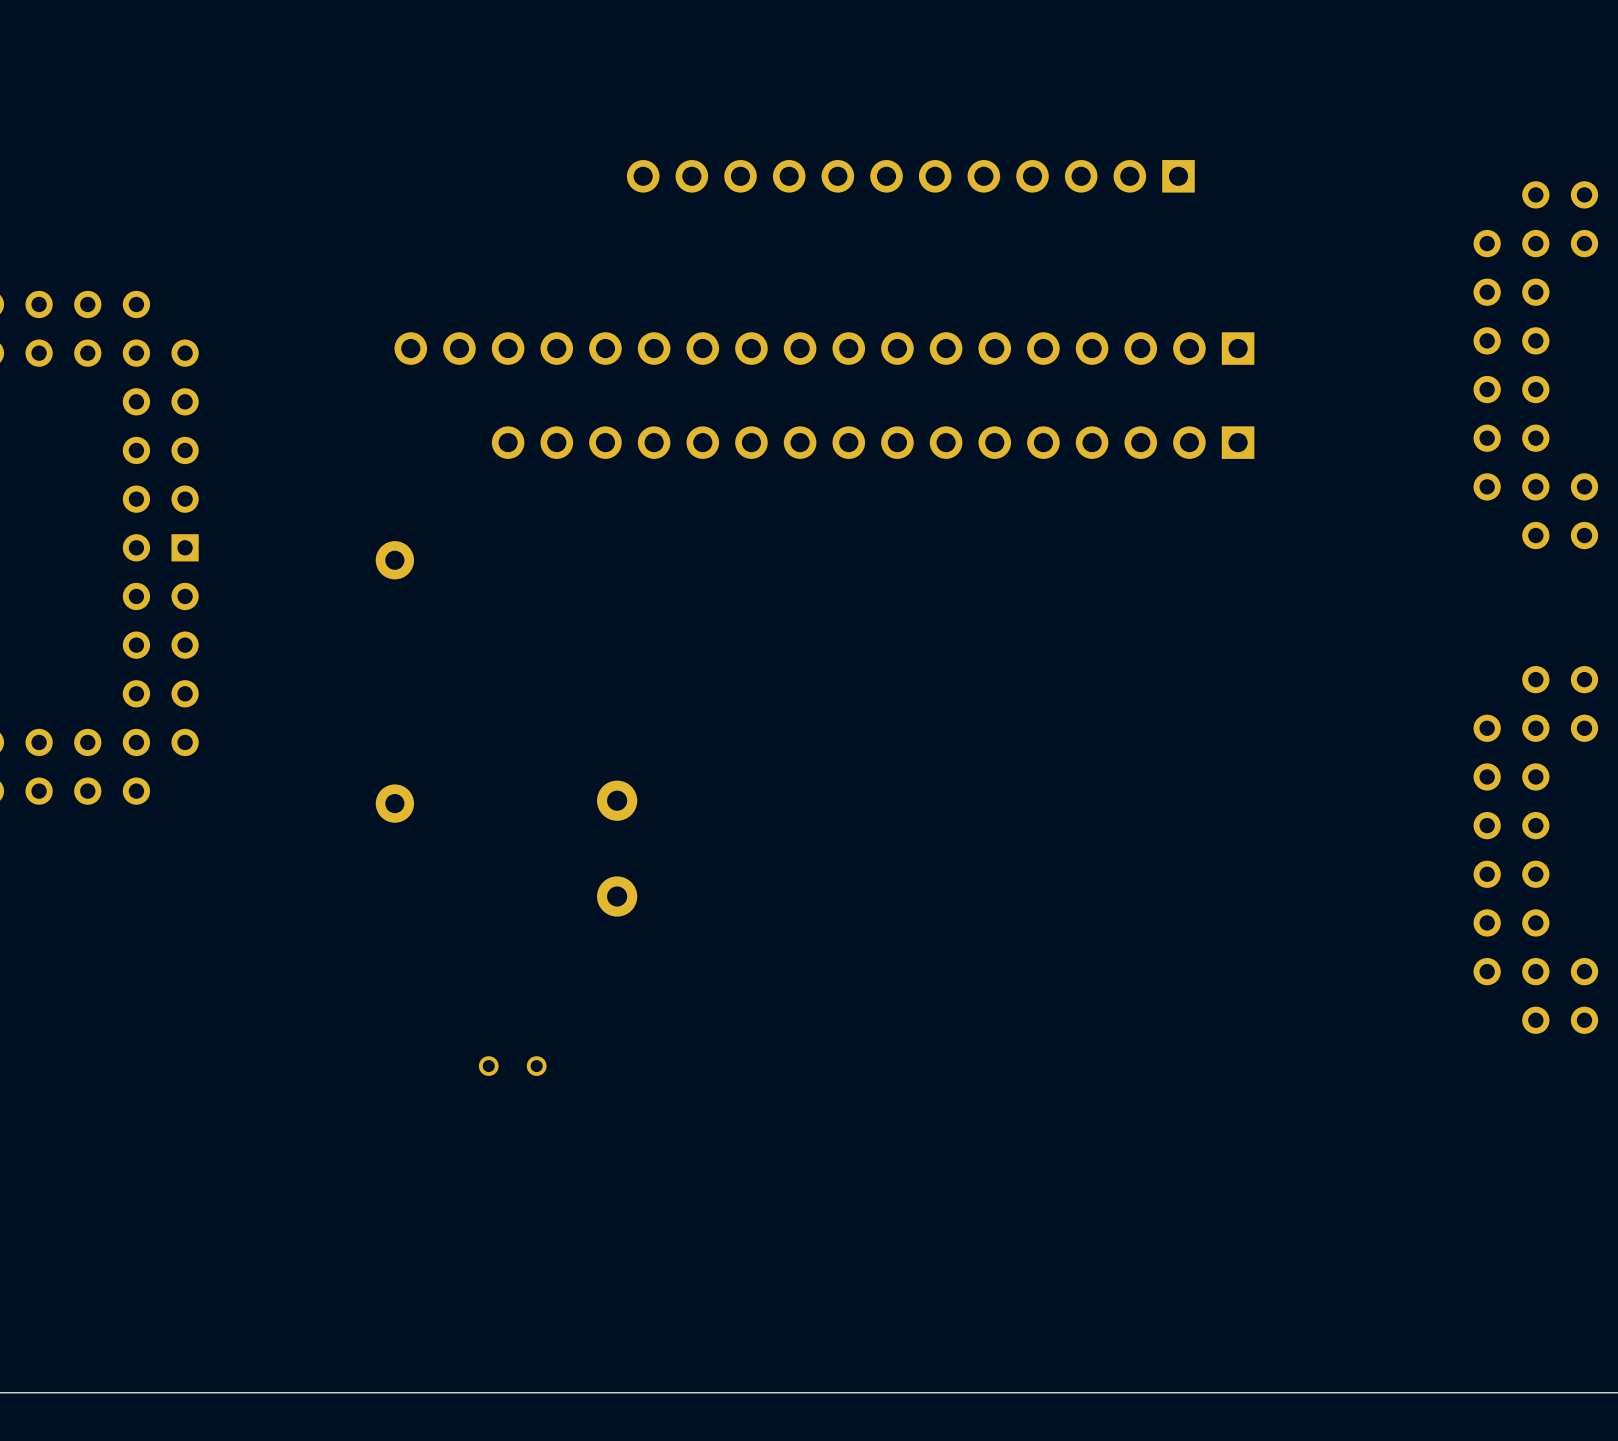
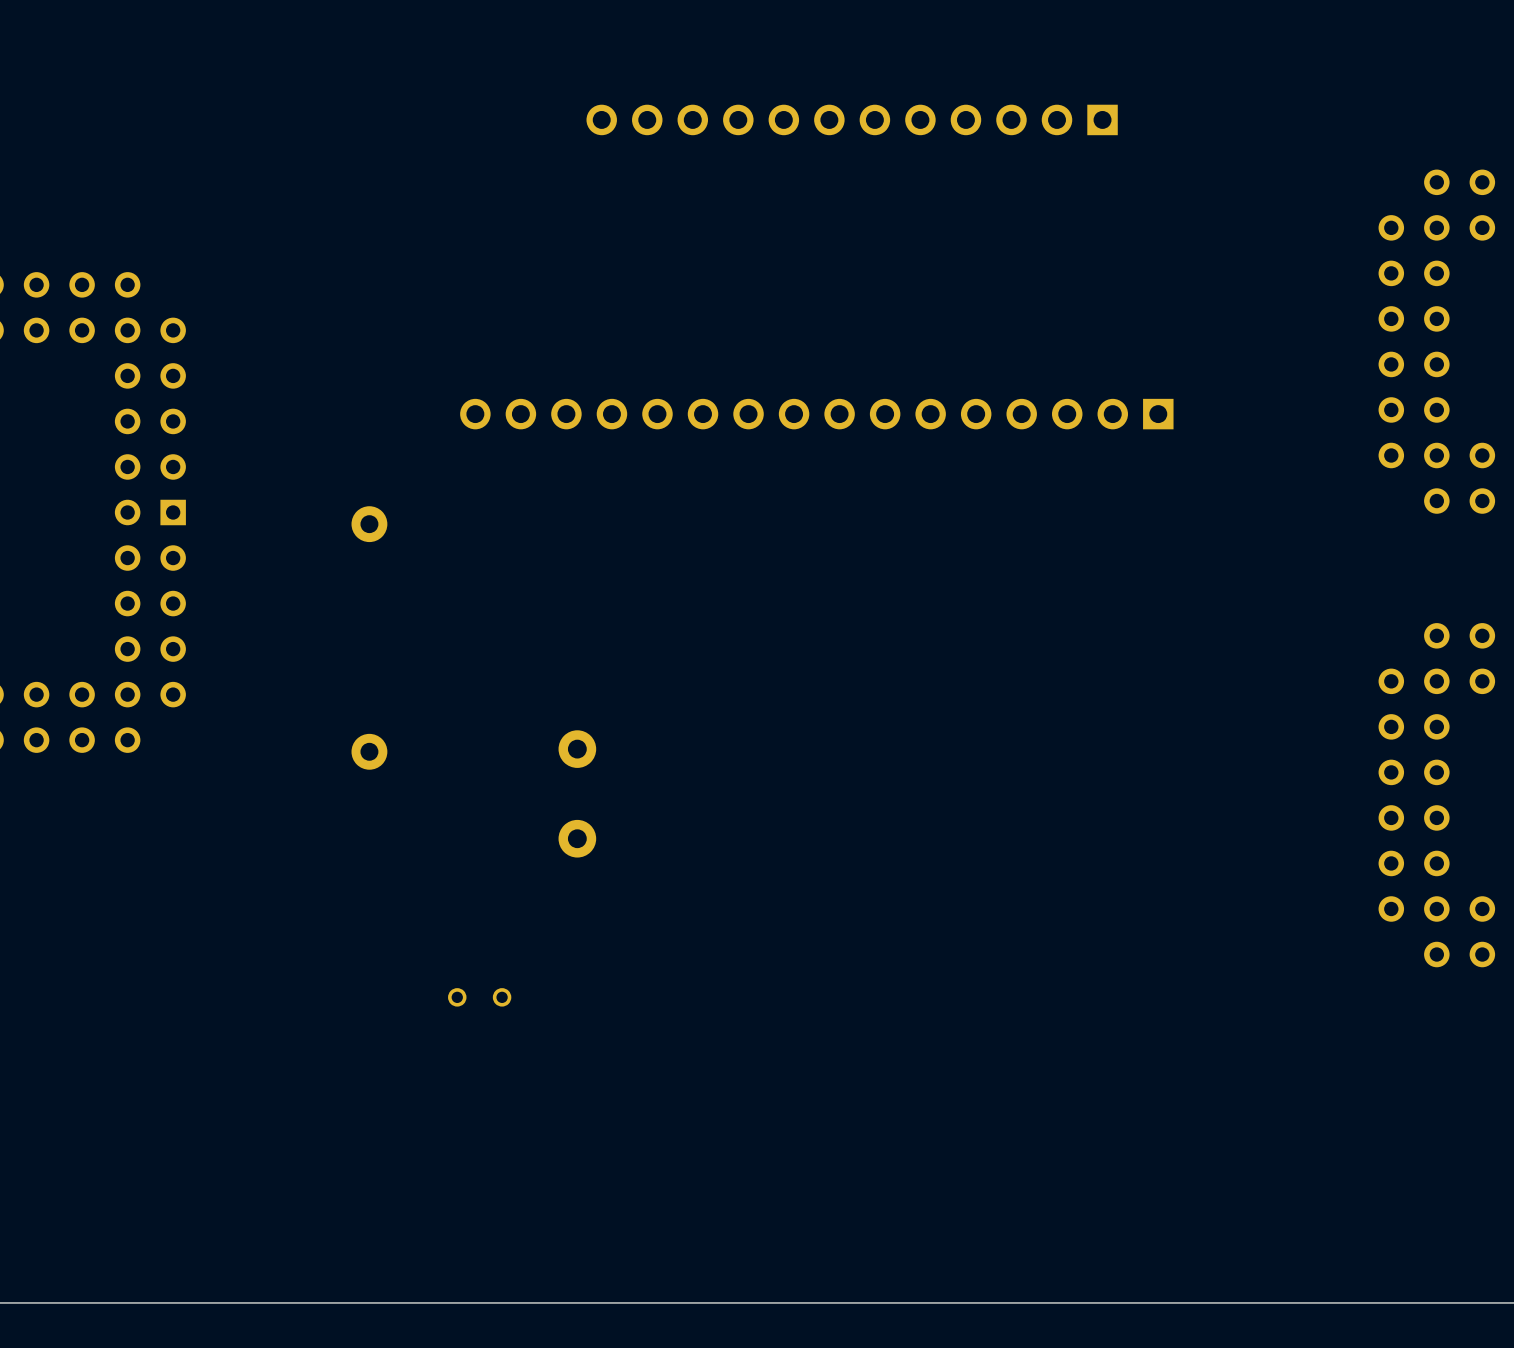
part position: (910, 176) -> (852, 119)
part: (824, 348) -> none

